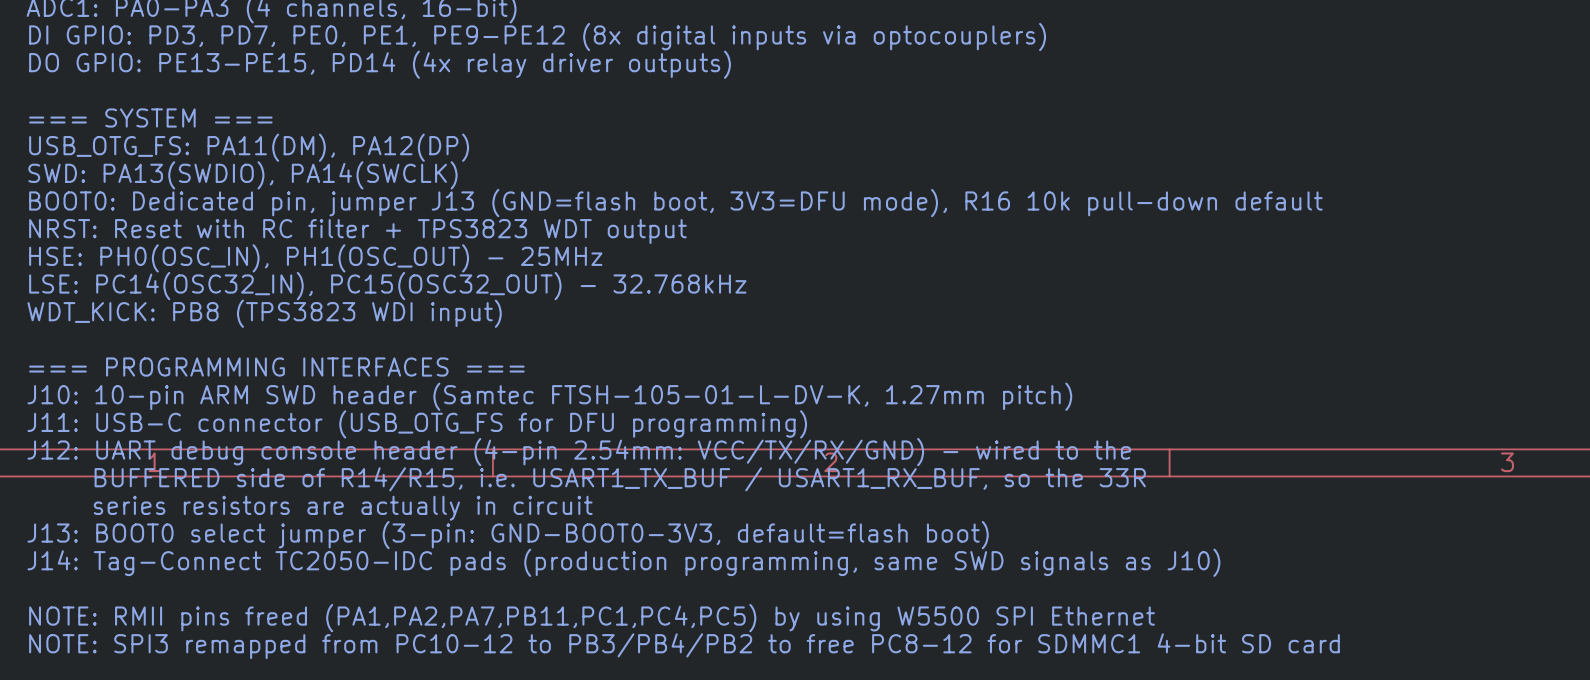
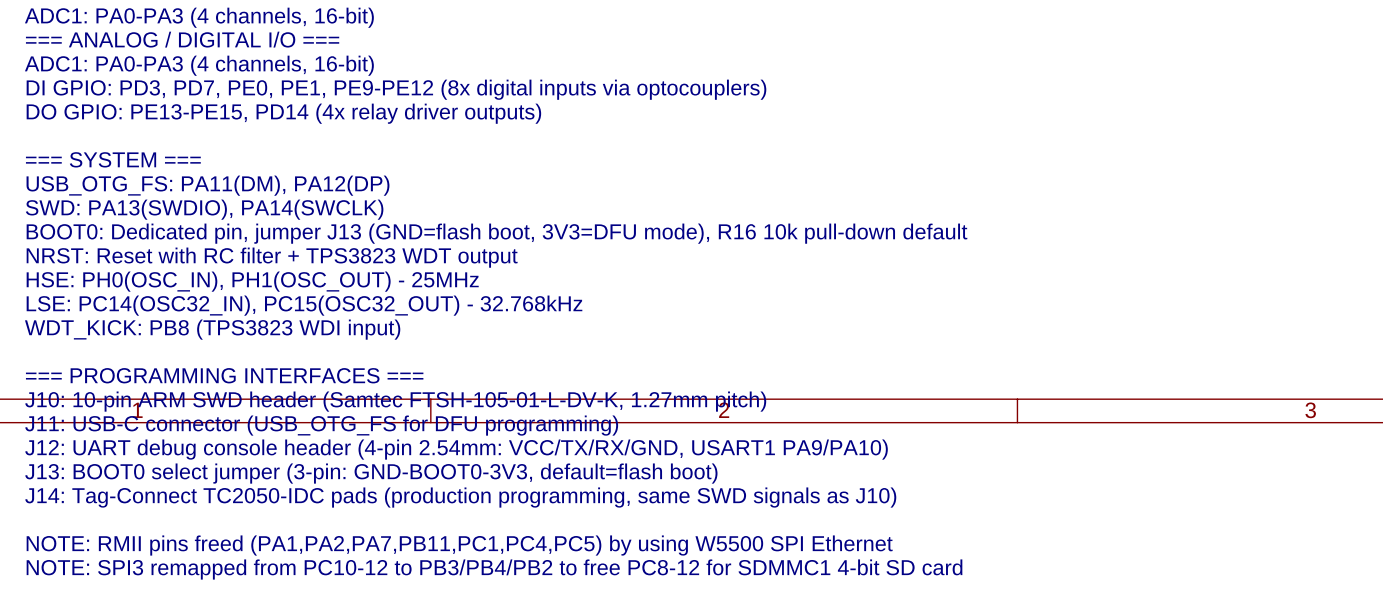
text: DI GPIO: PD3, PD7, PE0, PE1, PE9-PE12 (8x digital inputs via optocouplers) (537, 37) -> === ANALOG / DIGITAL I/O === (182, 39)
text: DO GPIO: PE13-PE15, PD14 (4x relay driver outputs) (380, 64) -> ADC1: PA0-PA3 (4 channels, 16-bit) (199, 65)
text: none -> DI GPIO: PD3, PD7, PE0, PE1, PE9-PE12 (8x digital inputs via optocouplers) (396, 89)
text: === SYSTEM === (150, 117) -> DO GPIO: PE13-PE15, PD14 (4x relay driver outputs) (283, 113)
text: USB_OTG_FS: PA11(DM), PA12(DP) (249, 147) -> none
text: SWD: PA13(SWDIO), PA14(SWCLK) (242, 175) -> === SYSTEM === (113, 159)
text: BOOT0: Dedicated pin, jumper J13 (GND=flash boot, 3V3=DFU mode), R16 10k pull-down default (675, 203) -> USB_OTG_FS: PA11(DM), PA12(DP) (207, 185)
text: NRST: Reset with RC filter + TPS3823 WDT output (357, 231) -> SWD: PA13(SWDIO), PA14(SWCLK) (204, 209)
text: HSE: PH0(OSC_IN), PH1(OSC_OUT) - 25MHz (315, 258) -> BOOT0: Dedicated pin, jumper J13 (GND=flash boot, 3V3=DFU mode), R16 10k pull-down default (496, 233)
text: LSE: PC14(OSC32_IN), PC15(OSC32_OUT) - 32.768kHz (387, 286) -> NRST: Reset with RC filter + TPS3823 WDT output (272, 257)
text: WDT_KICK: PB8 (TPS3823 WDI input) (264, 313) -> HSE: PH0(OSC_IN), PH1(OSC_OUT) - 25MHz (252, 281)
text: none -> LSE: PC14(OSC32_IN), PC15(OSC32_OUT) - 32.768kHz (304, 305)
text: === PROGRAMMING INTERFACES === (276, 367) -> WDT_KICK: PB8 (TPS3823 WDI input) (212, 329)
text: J10: 10-pin ARM SWD header (Samtec FTSH-105-01-L-DV-K, 1.27mm pitch) (549, 396) -> none
text: J11: USB-C connector (USB_OTG_FS for DFU programming) (417, 424) -> === PROGRAMMING INTERFACES === (224, 375)
text: J12: UART debug console header (4-pin 2.54mm: VCC/TX/RX/GND) - wired to the (579, 452) -> J10: 10-pin ARM SWD header (Samtec FTSH-105-01-L-DV-K, 1.27mm pitch) (395, 401)
text: BUFFERED side of R14/R15, i.e. USART1_TX_BUF / USART1_RX_BUF, so the 33R (620, 479) -> J11: USB-C connector (USB_OTG_FS for DFU programming) (321, 425)
text: series resistors are actually in circuit (343, 508) -> J12: UART debug console header (4-pin 2.54mm: VCC/TX/RX/GND, USART1 PA9/PA10) (456, 449)

